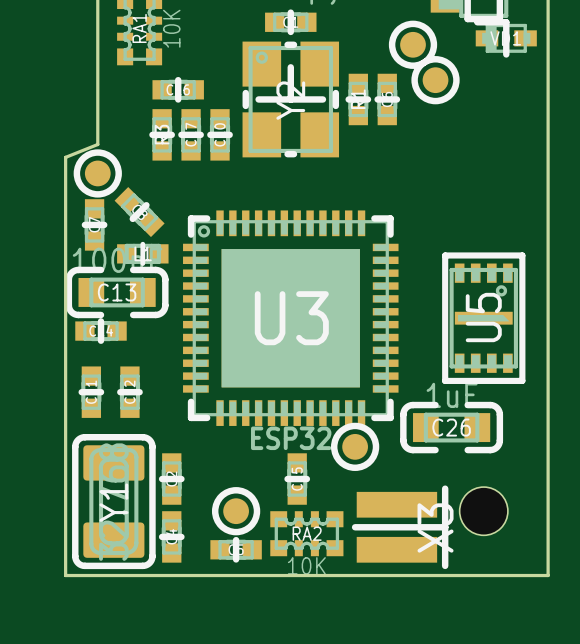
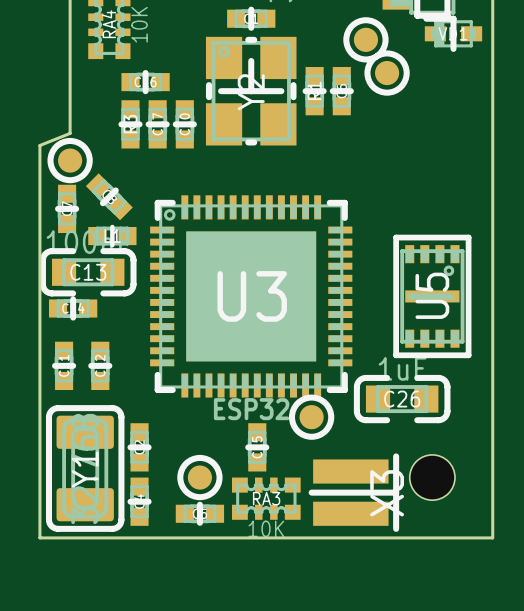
RA1 name: RA1 (139, 28) -> RA4 (109, 24)
RA2 name: RA2 (307, 533) -> RA3 (266, 498)

